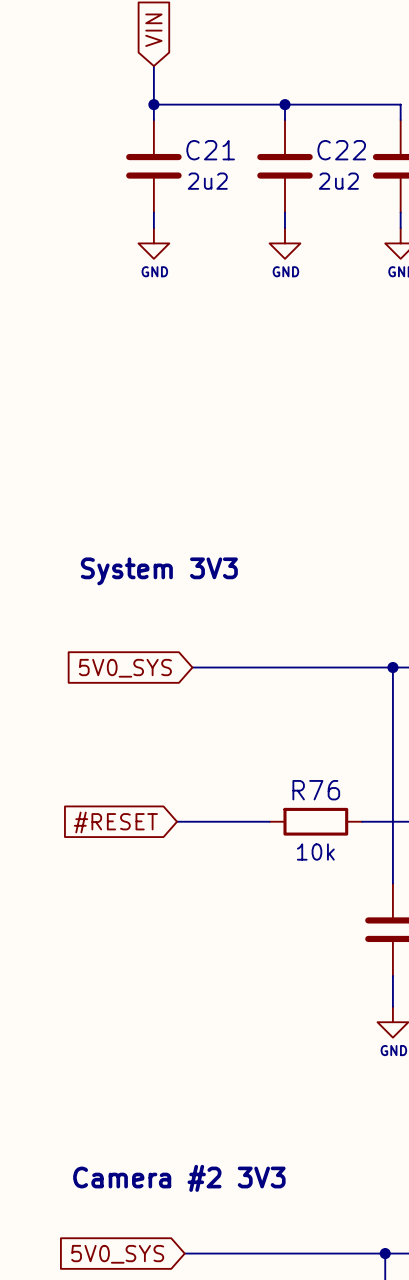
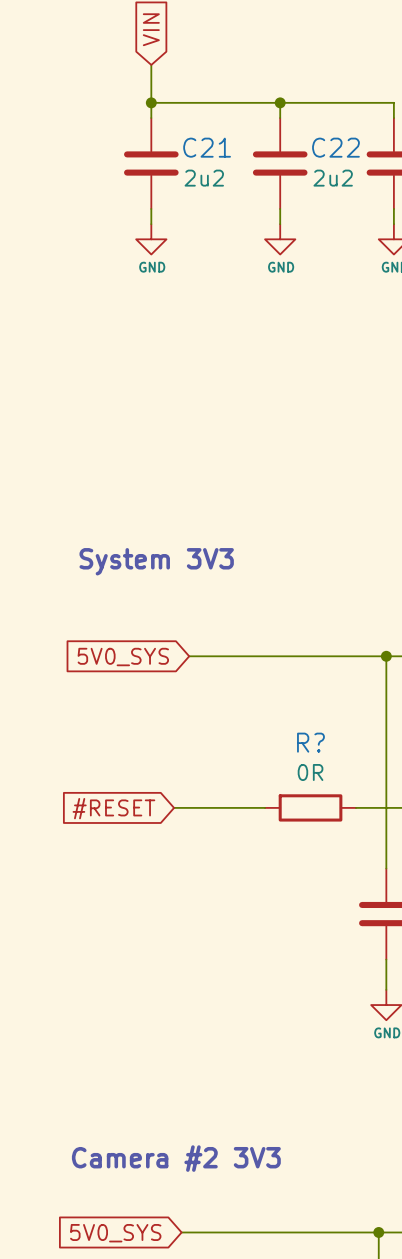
R76 name: R76 (316, 790) -> R? (310, 742)
R76 text: 10k (315, 852) -> 0R (310, 772)

